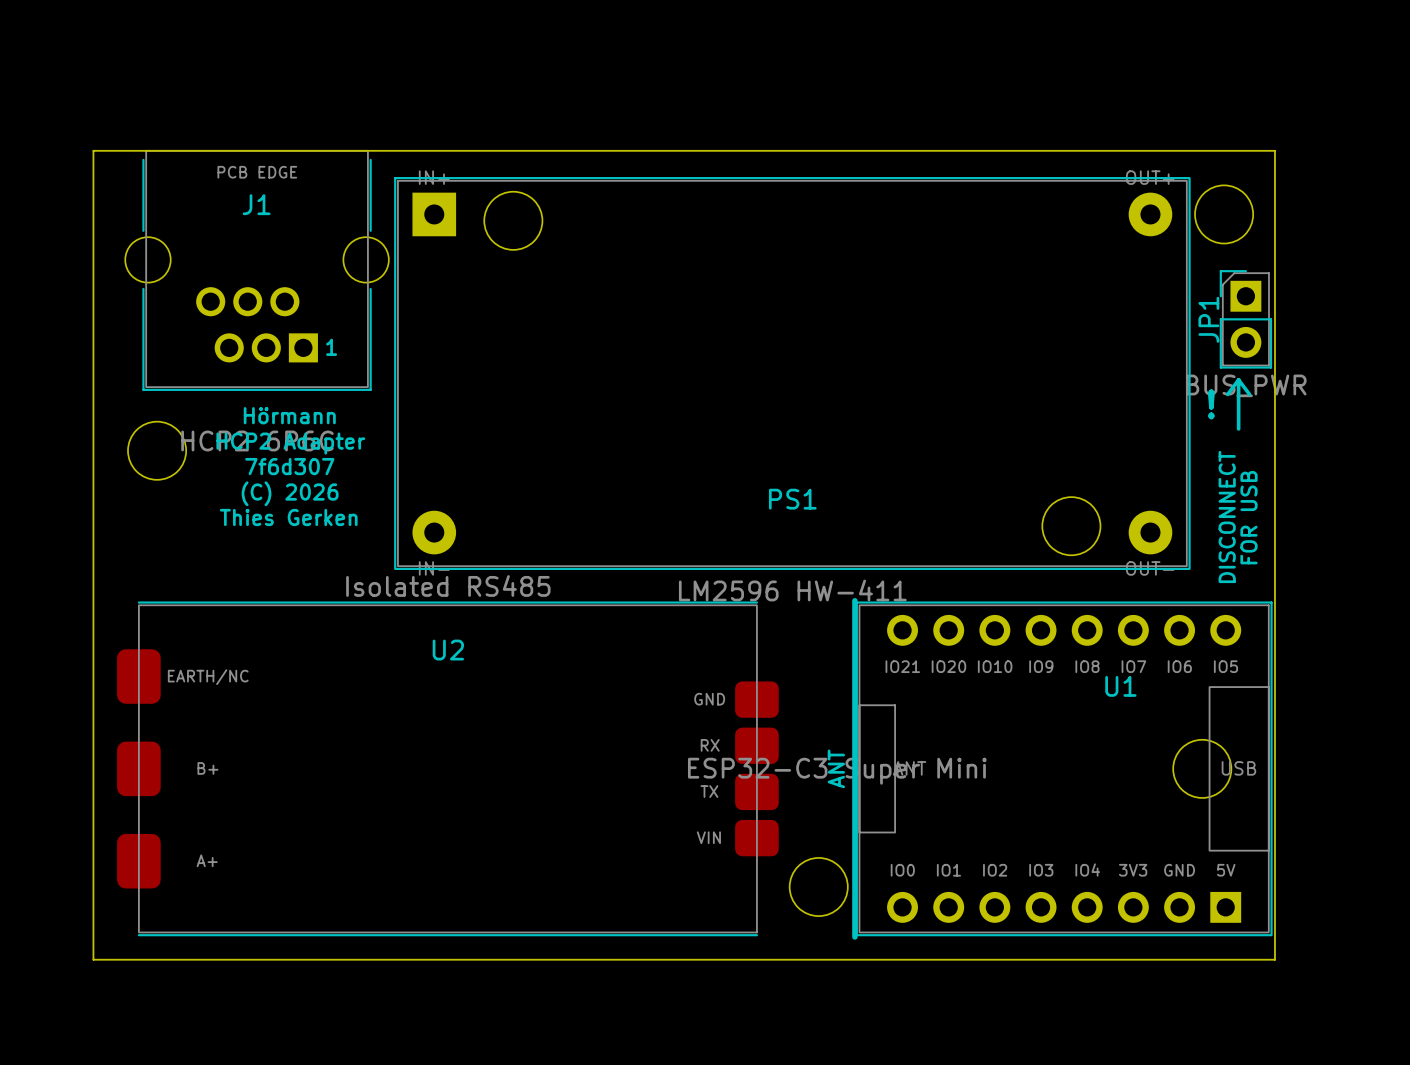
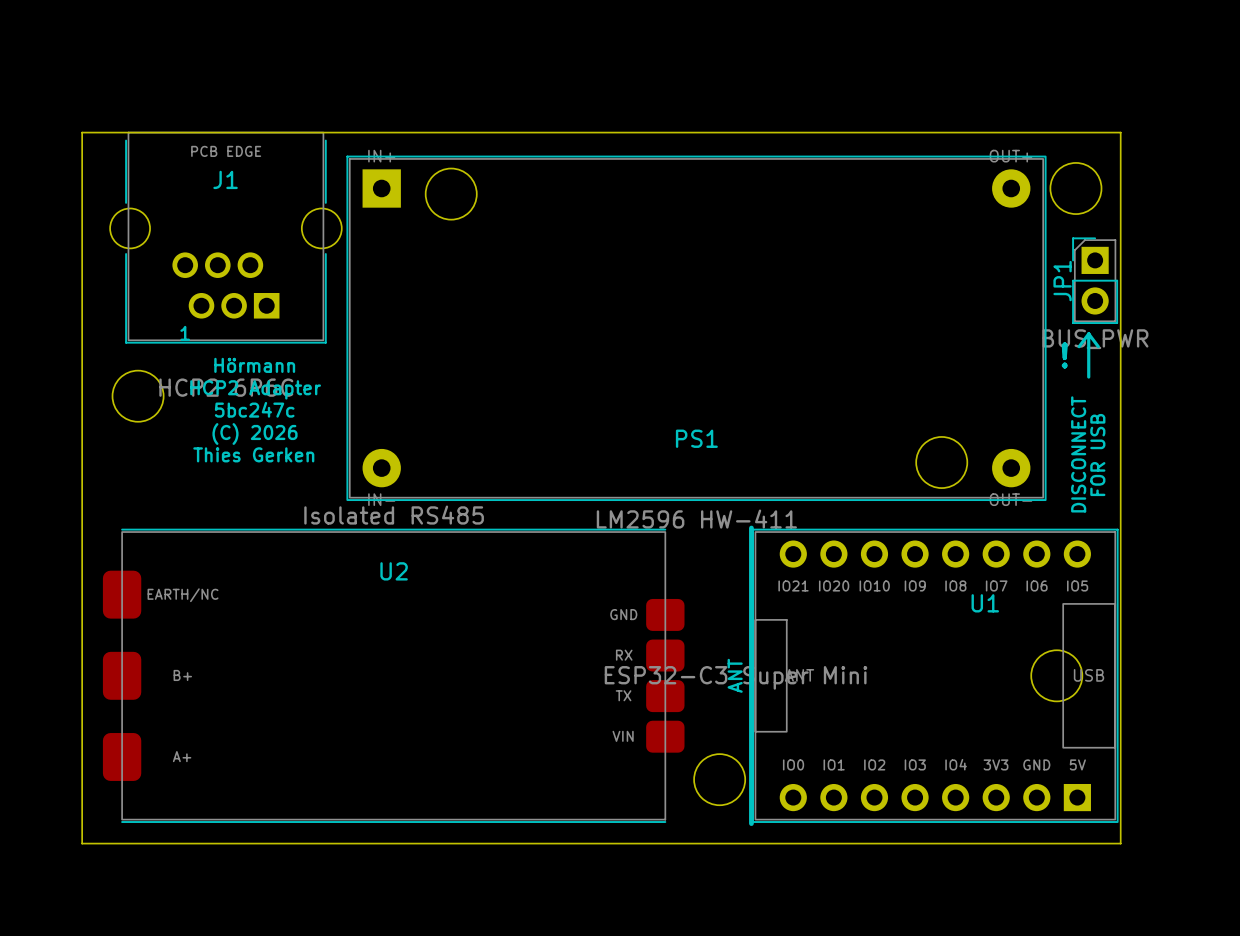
text position: 1 (331, 347) -> 1 (185, 333)
text: 7f6d307 (289, 466) -> 5bc247c (254, 409)

